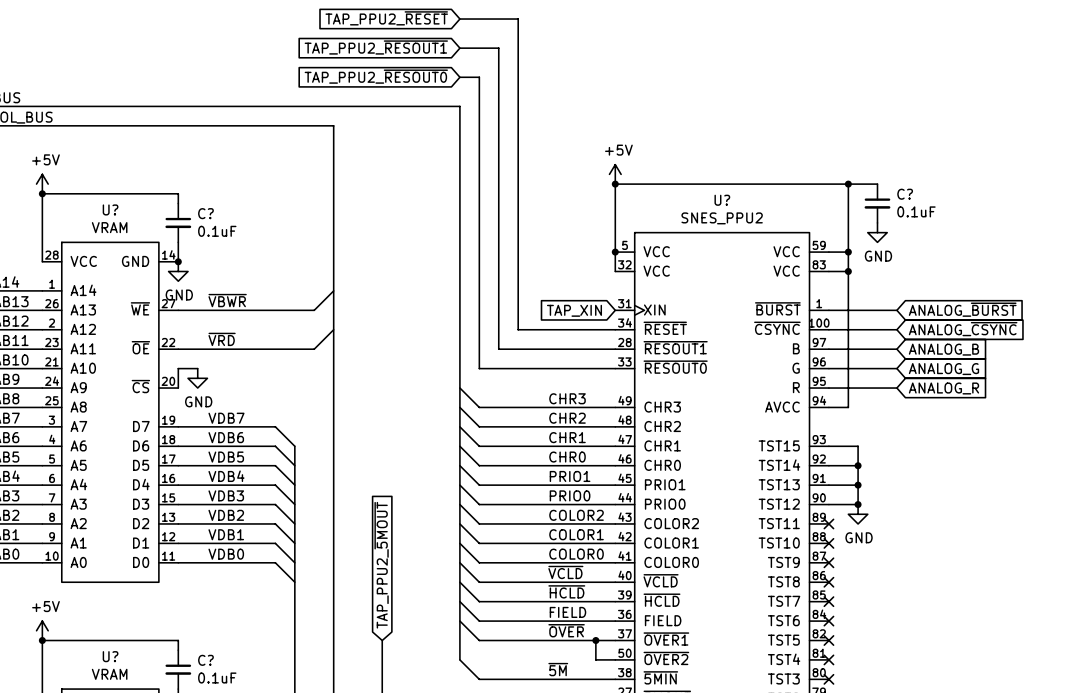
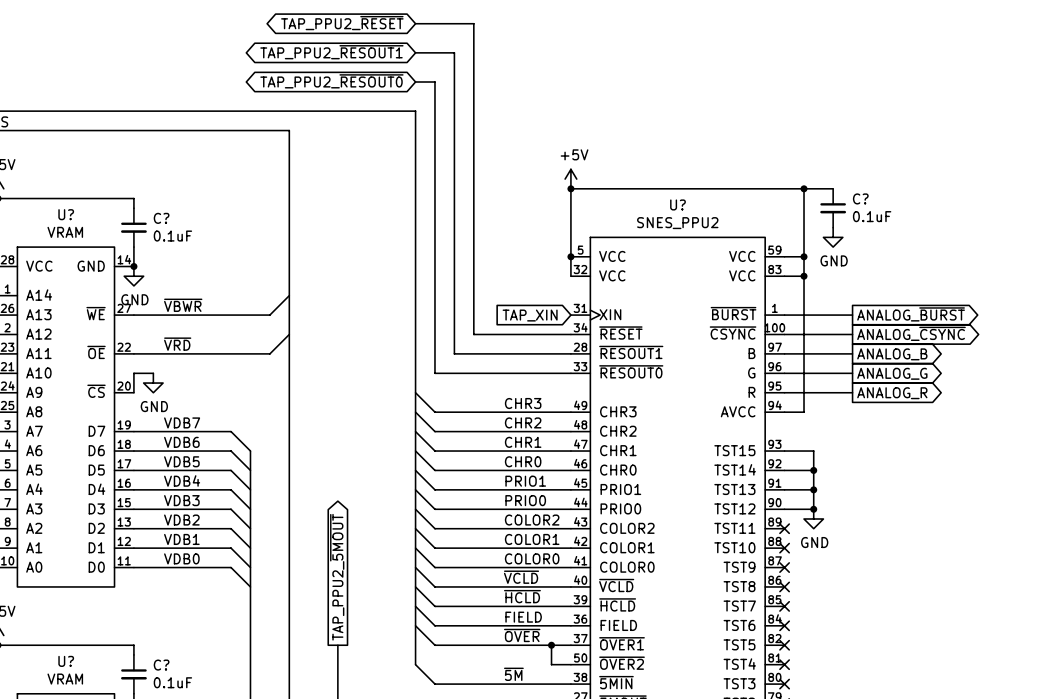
global label shape: input (386, 18) -> bidirectional (342, 23)
global label shape: input (376, 47) -> bidirectional (331, 52)
global label shape: input (376, 76) -> bidirectional (331, 81)
global label shape: input (962, 309) -> output (911, 314)
global label shape: input (963, 329) -> output (911, 333)
global label shape: input (943, 349) -> output (892, 354)
global label shape: input (943, 369) -> output (892, 373)
global label shape: input (943, 388) -> output (892, 393)
global label shape: input (381, 565) -> output (337, 577)

